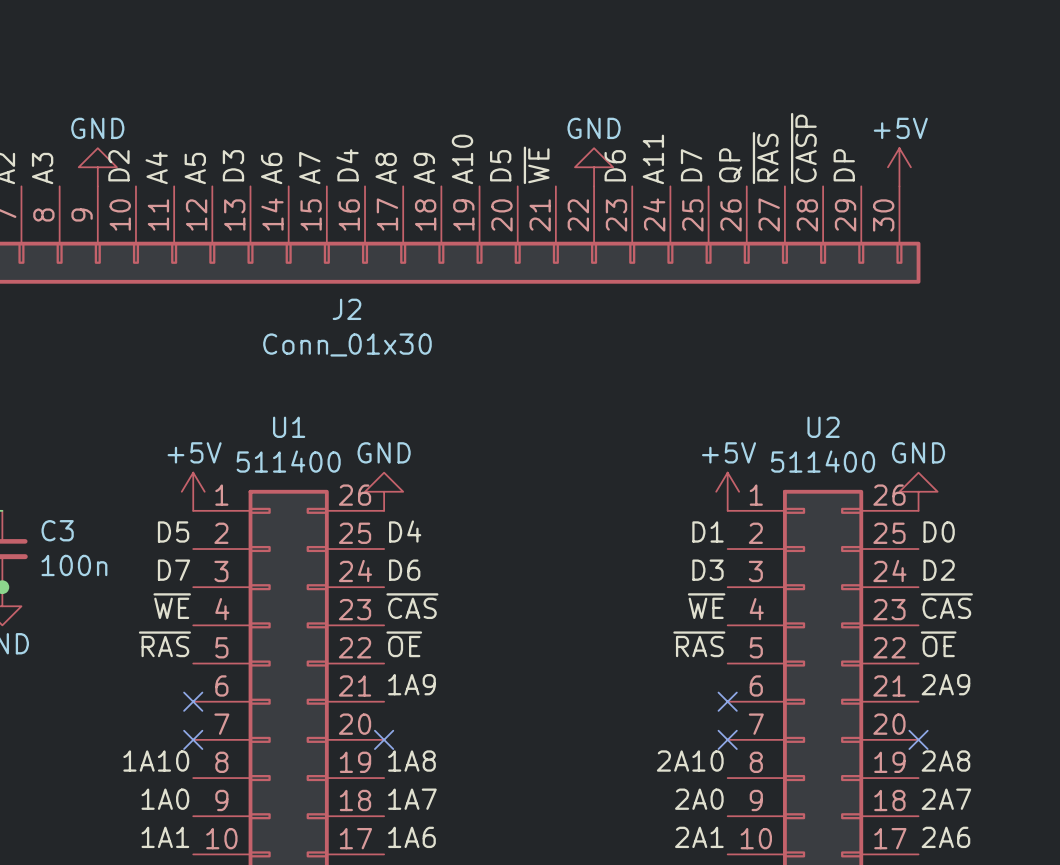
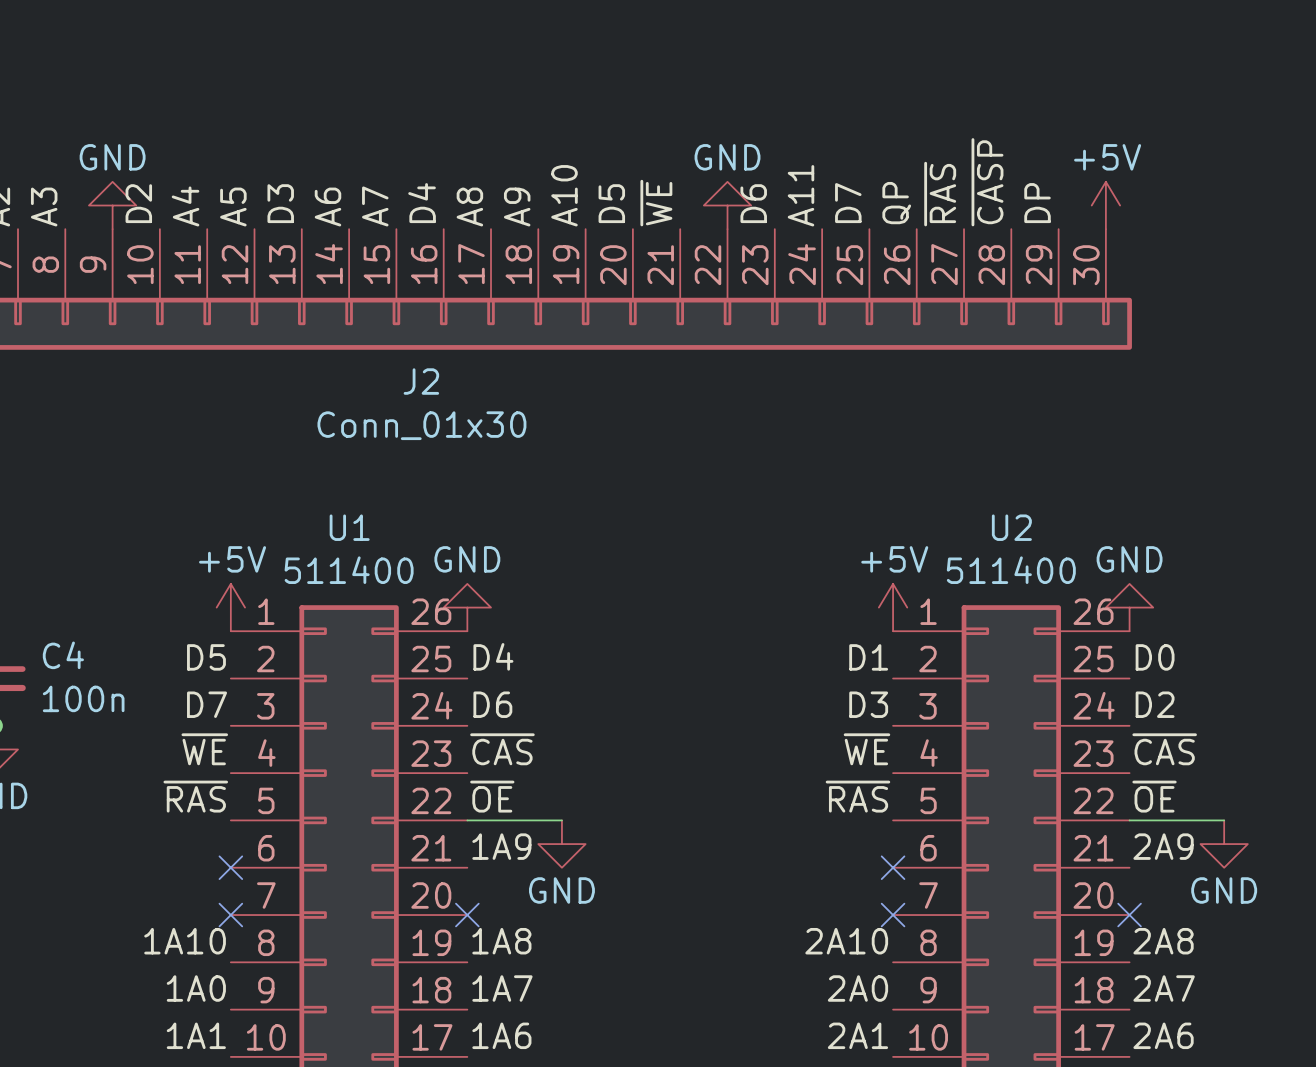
C3 name: C3 (57, 530) -> C4 (63, 655)
wire: none -> (467, 820) (561, 820)
wire: none -> (1129, 820) (1224, 820)
power symbol: none -> GND (561, 844)
power symbol: none -> GND (1224, 844)

